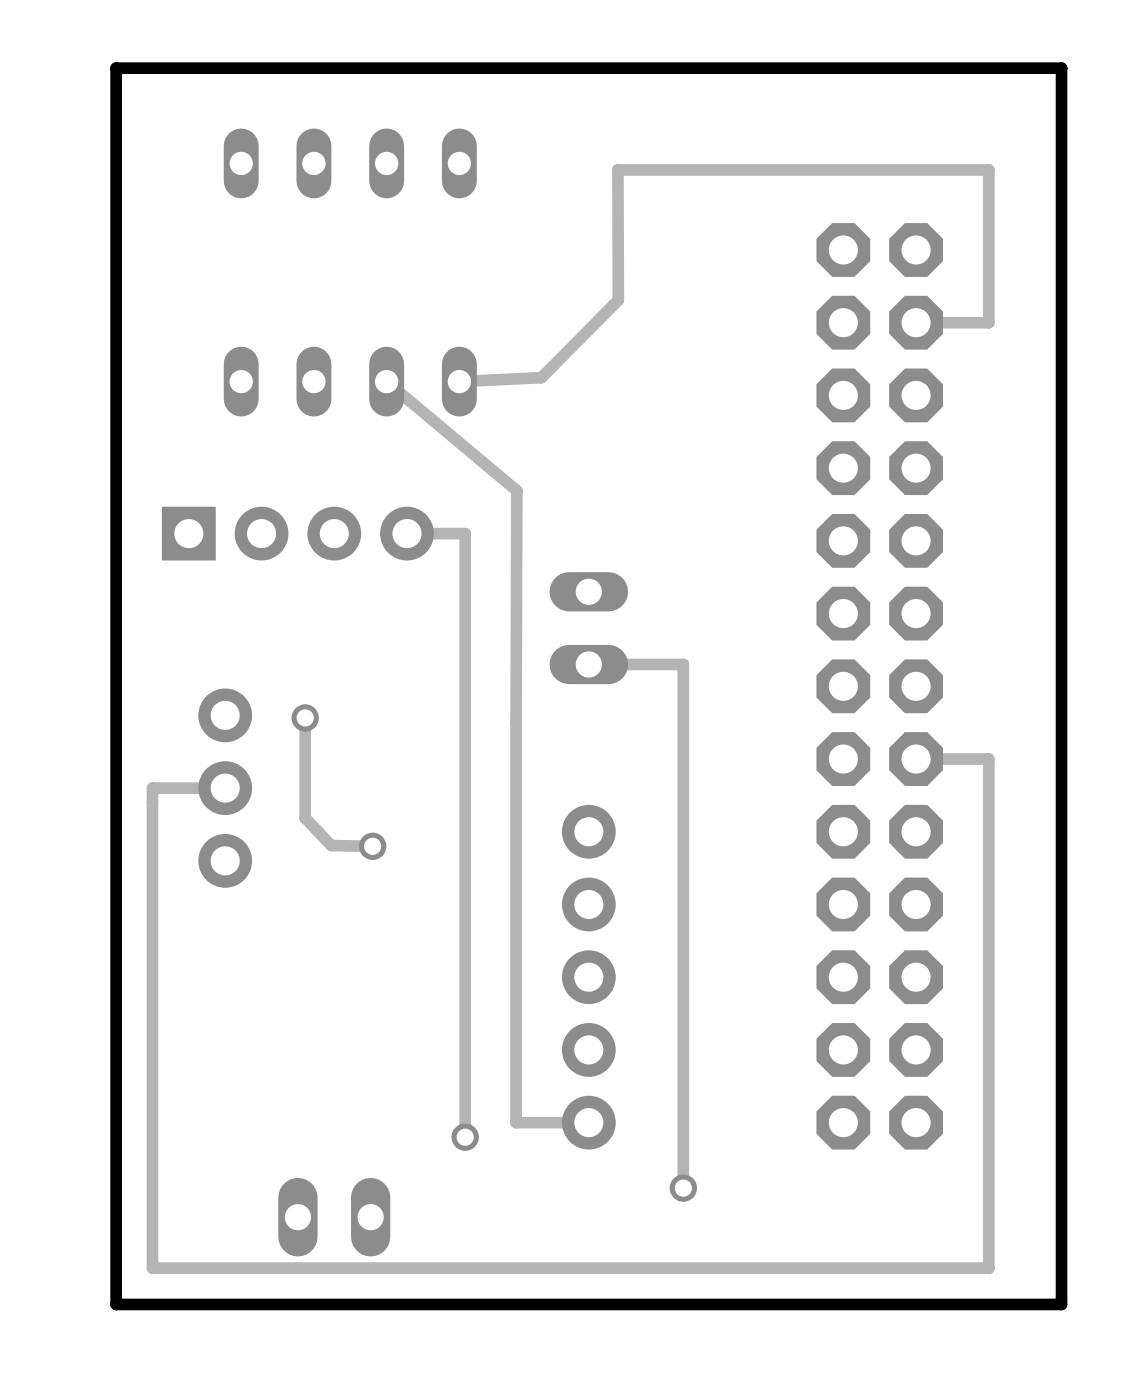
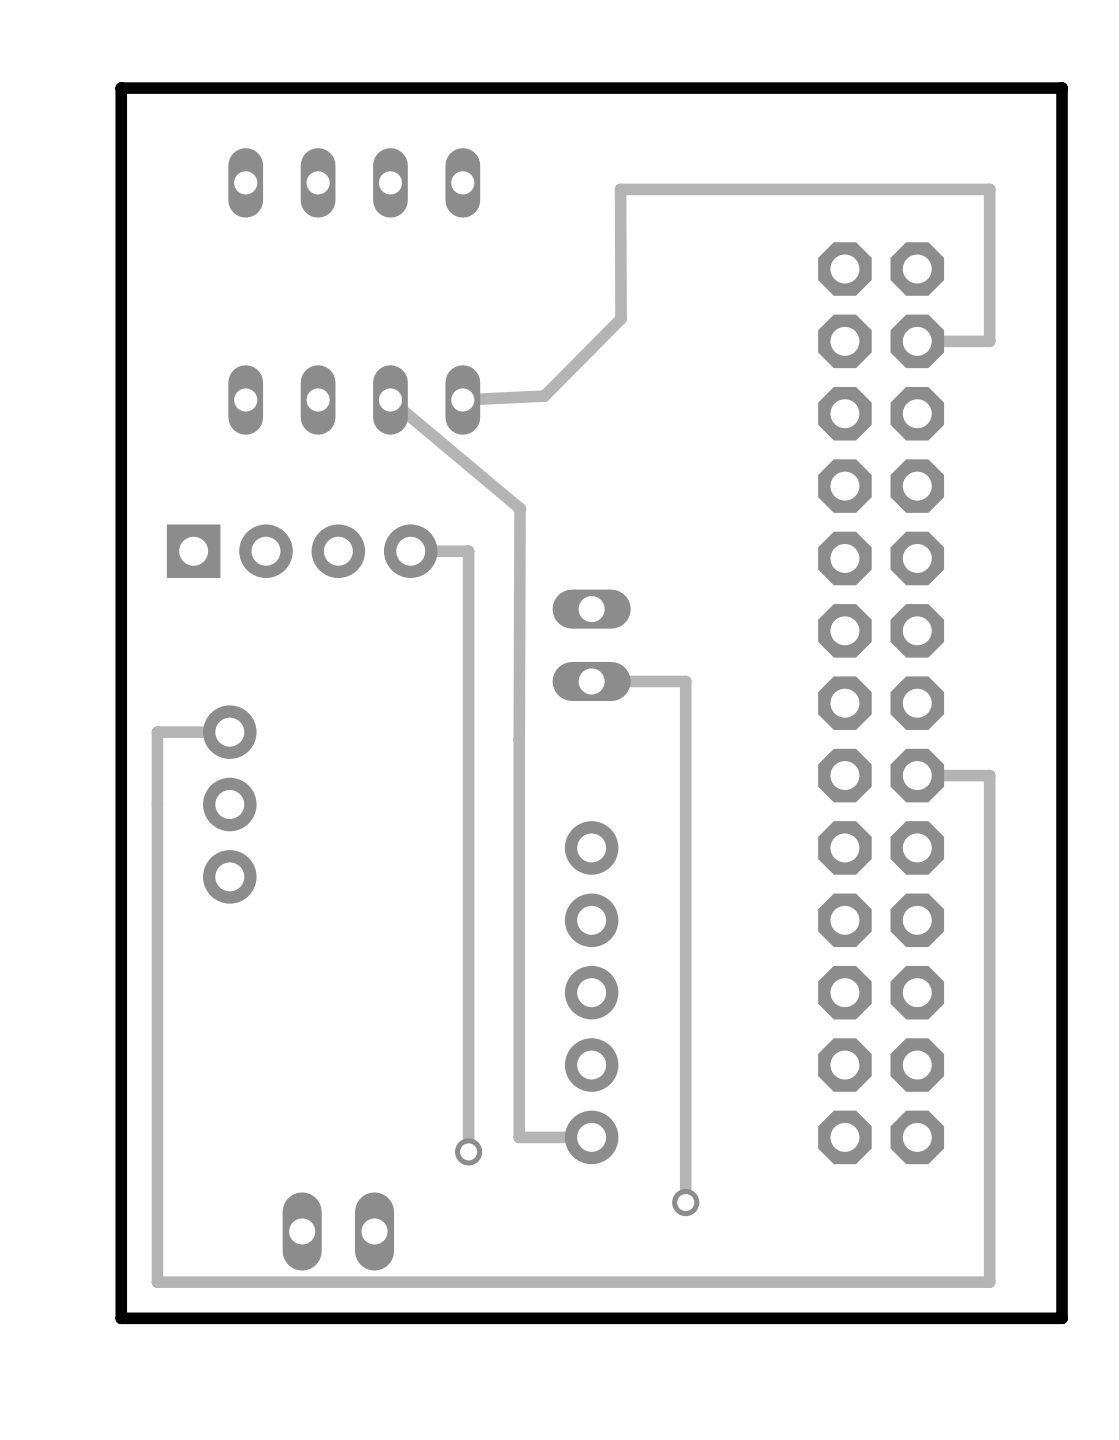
track: (305, 717) (305, 818) (331, 845) (372, 846) -> none
via: (305, 717) -> none
track: (225, 788) (152, 788) -> (229, 732) (157, 732) (157, 804)
via: (372, 846) -> none

